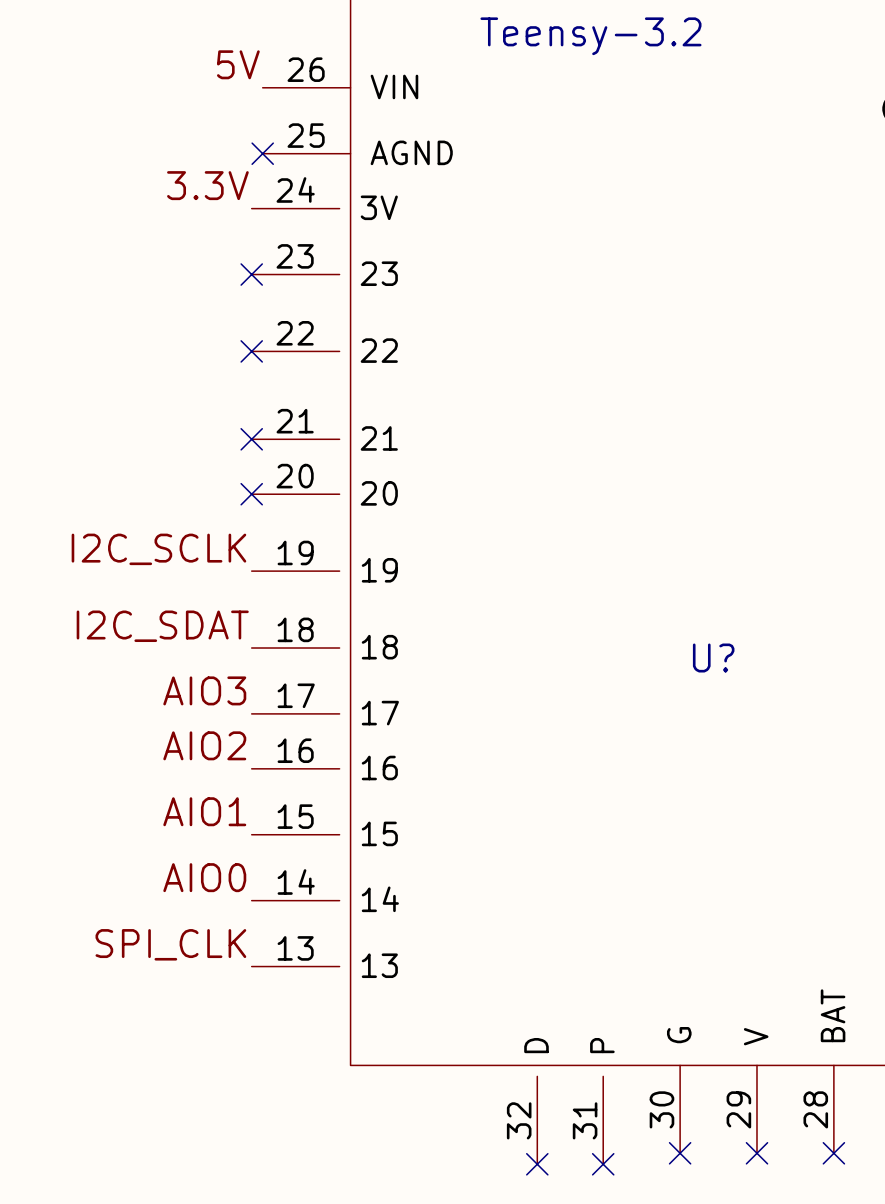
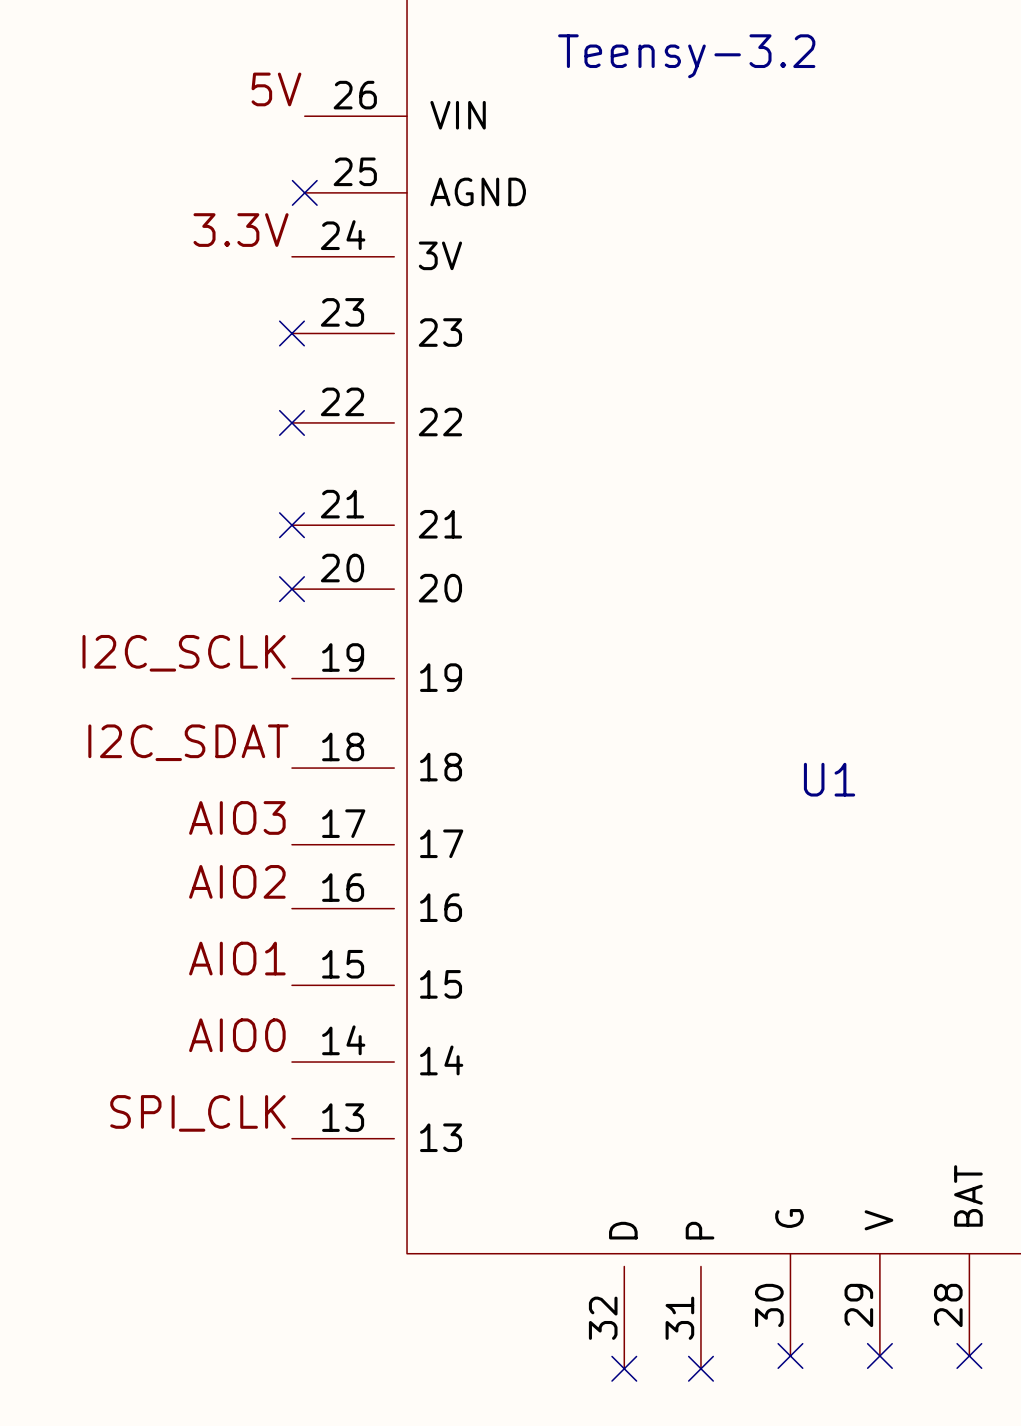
U? name: U? (713, 658) -> U1 (829, 779)

